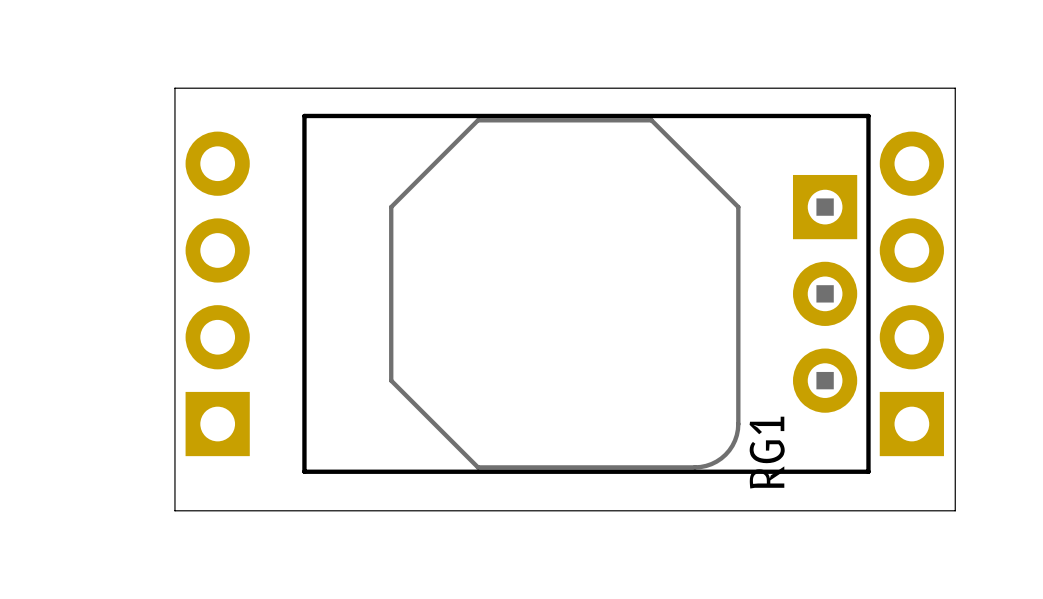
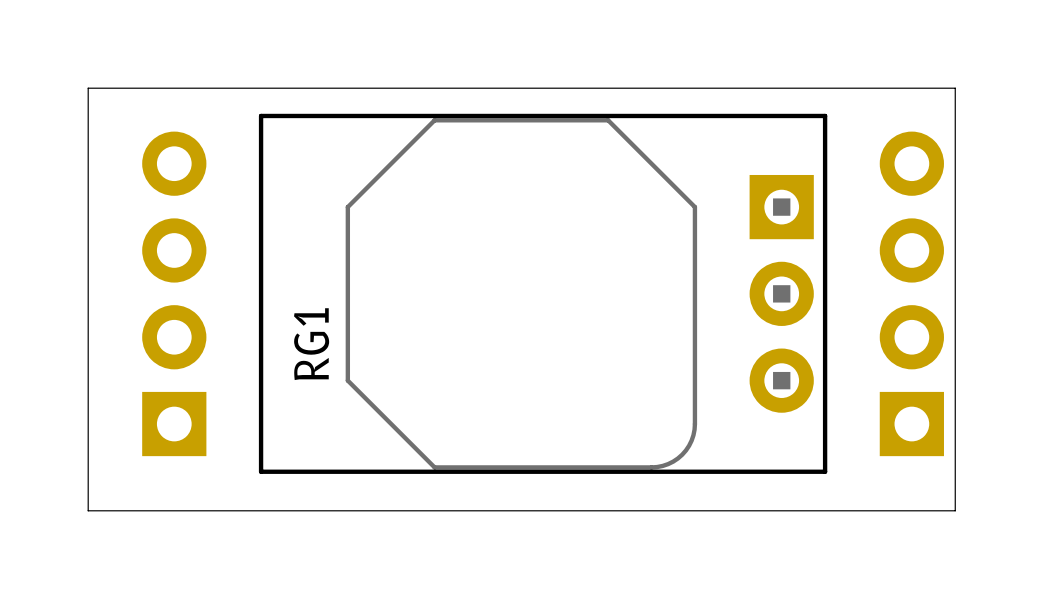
board edge: (174, 88) (174, 510) -> (174, 88) (88, 88) (88, 510) (174, 510)
part position: (217, 293) -> (174, 293)
RG1 position: (586, 293) -> (543, 293)
RG1 name position: RG1 (767, 452) -> RG1 (311, 344)

